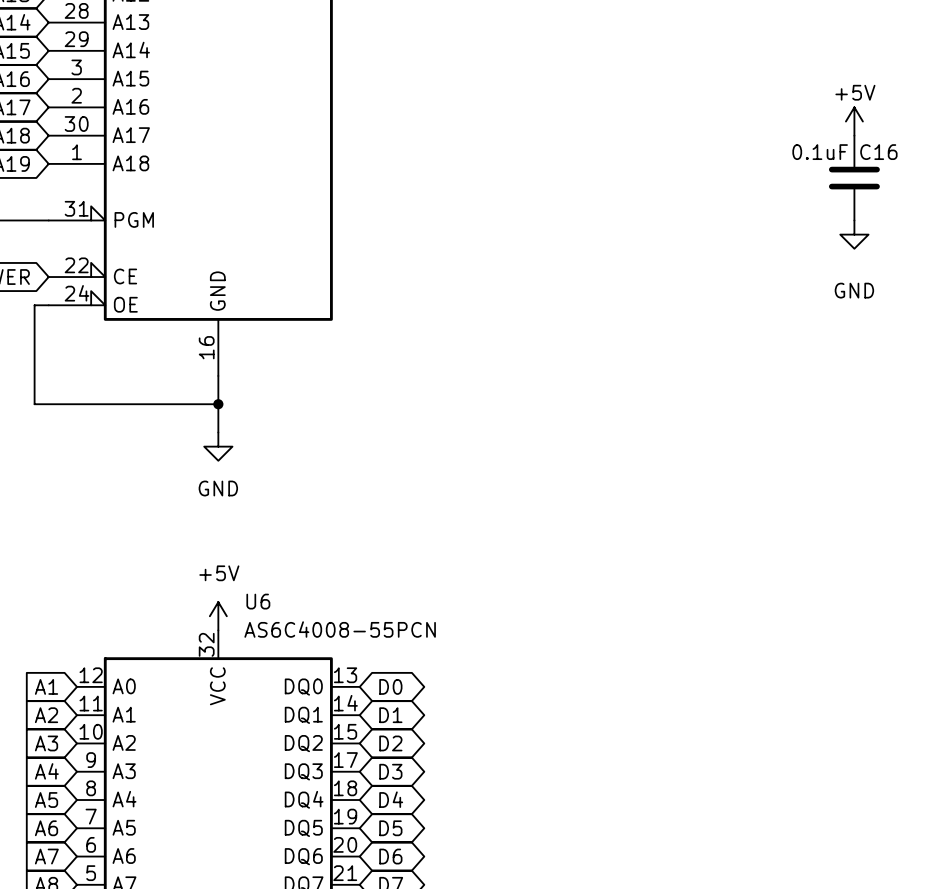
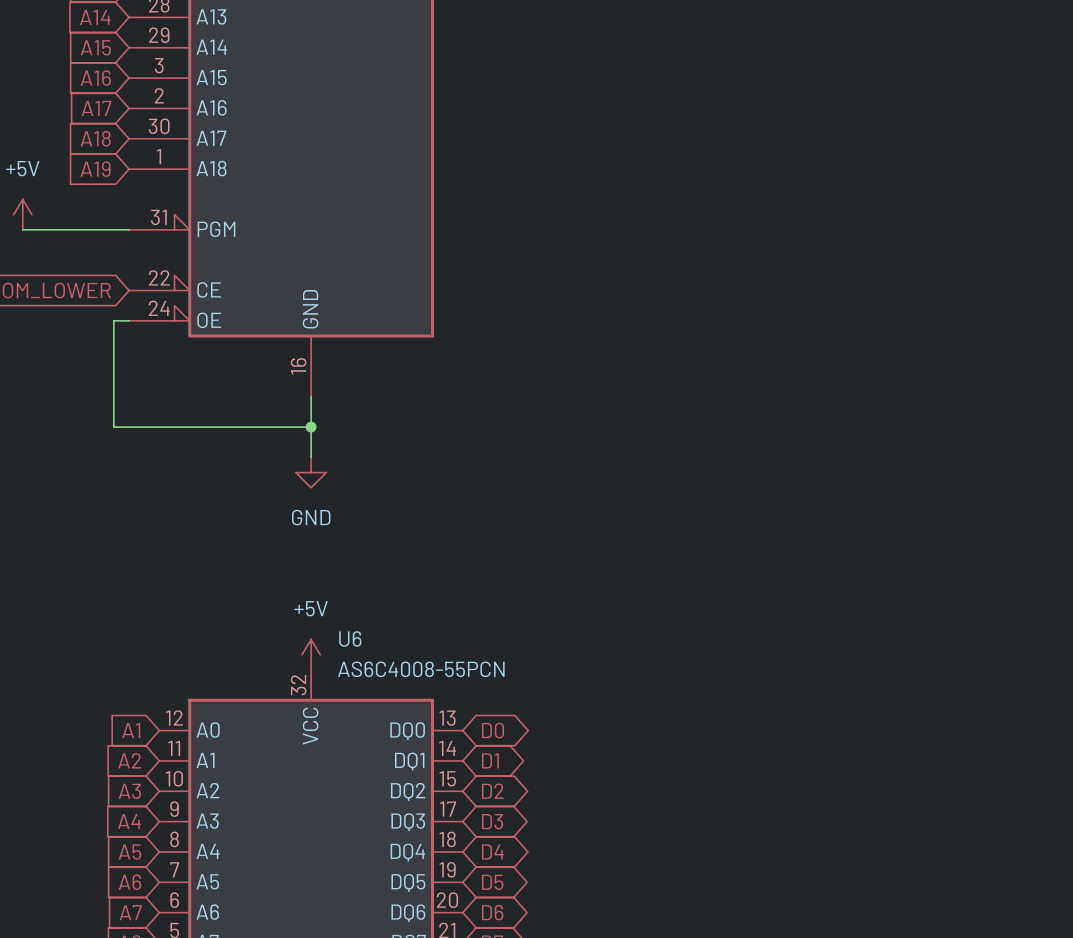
power symbol: +5V (854, 121) -> none
C16: 0.1uF (854, 178) -> none
power symbol: GND (854, 234) -> none

